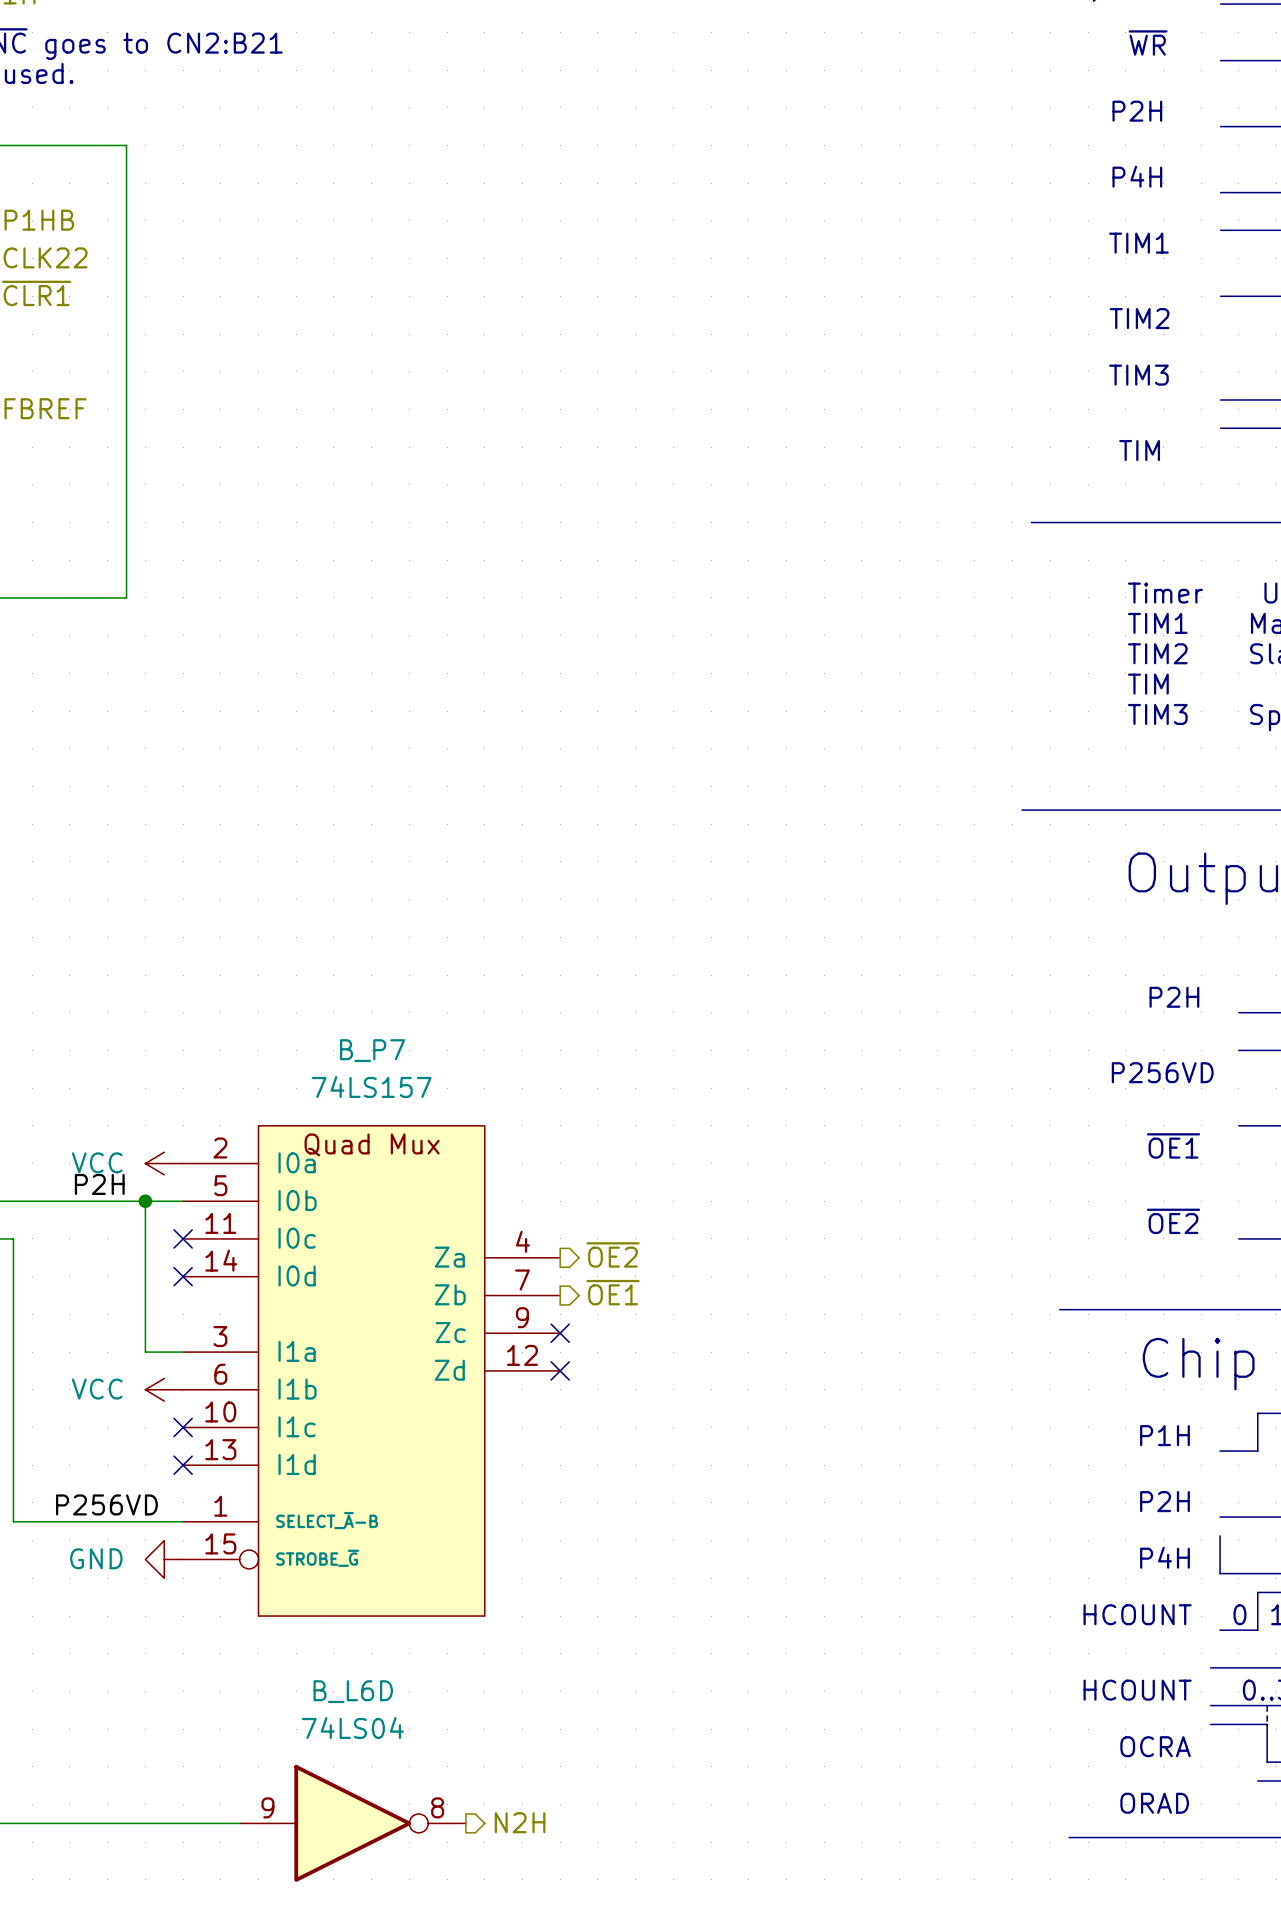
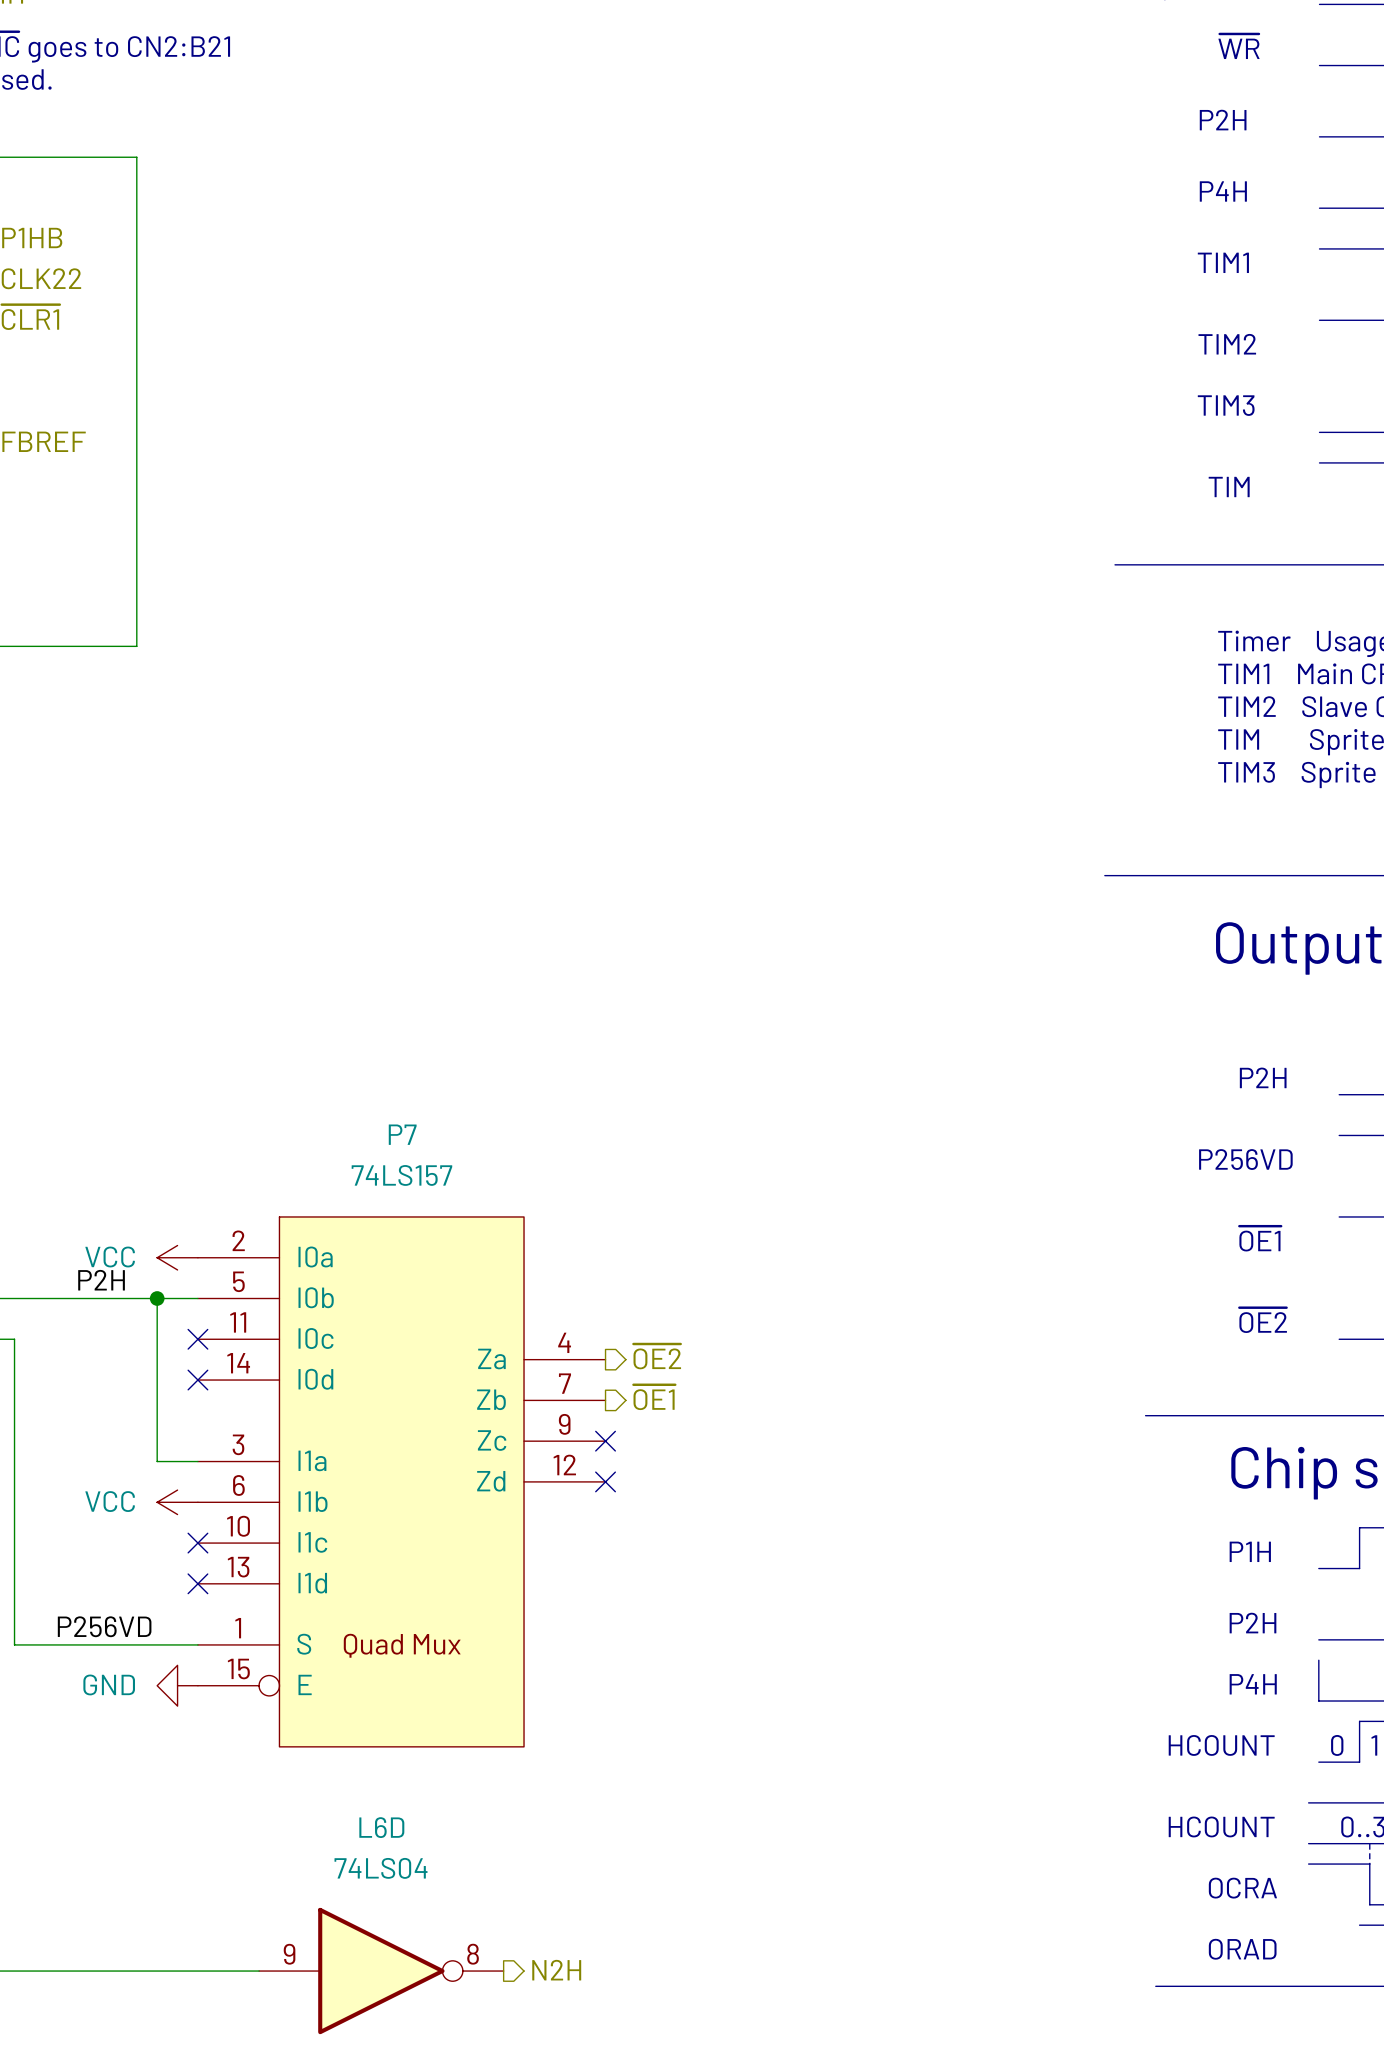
B_P7 name: B_P7 (372, 1050) -> P7 (402, 1134)
B_P7 text position: Quad Mux (372, 1144) -> Quad Mux (402, 1645)
B_P7 pin name: SELECT_~{A}-B (327, 1520) -> S (304, 1644)
B_P7 pin name: STROBE_~{G} (317, 1558) -> E (305, 1684)
B_L6D name: B_L6D (353, 1691) -> L6D (381, 1827)

